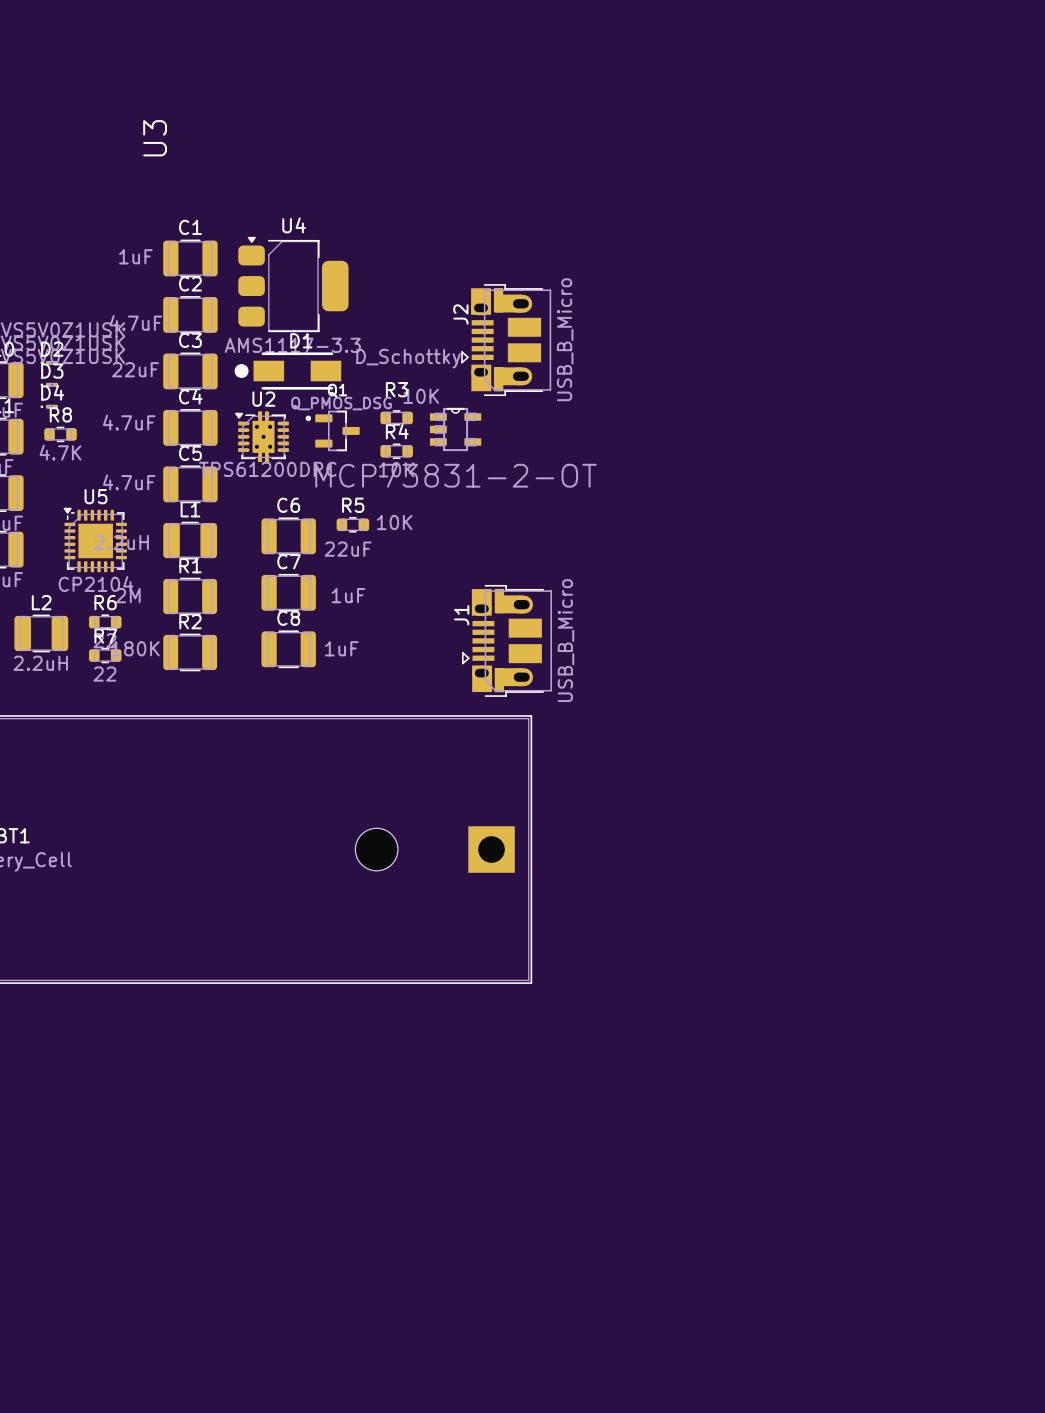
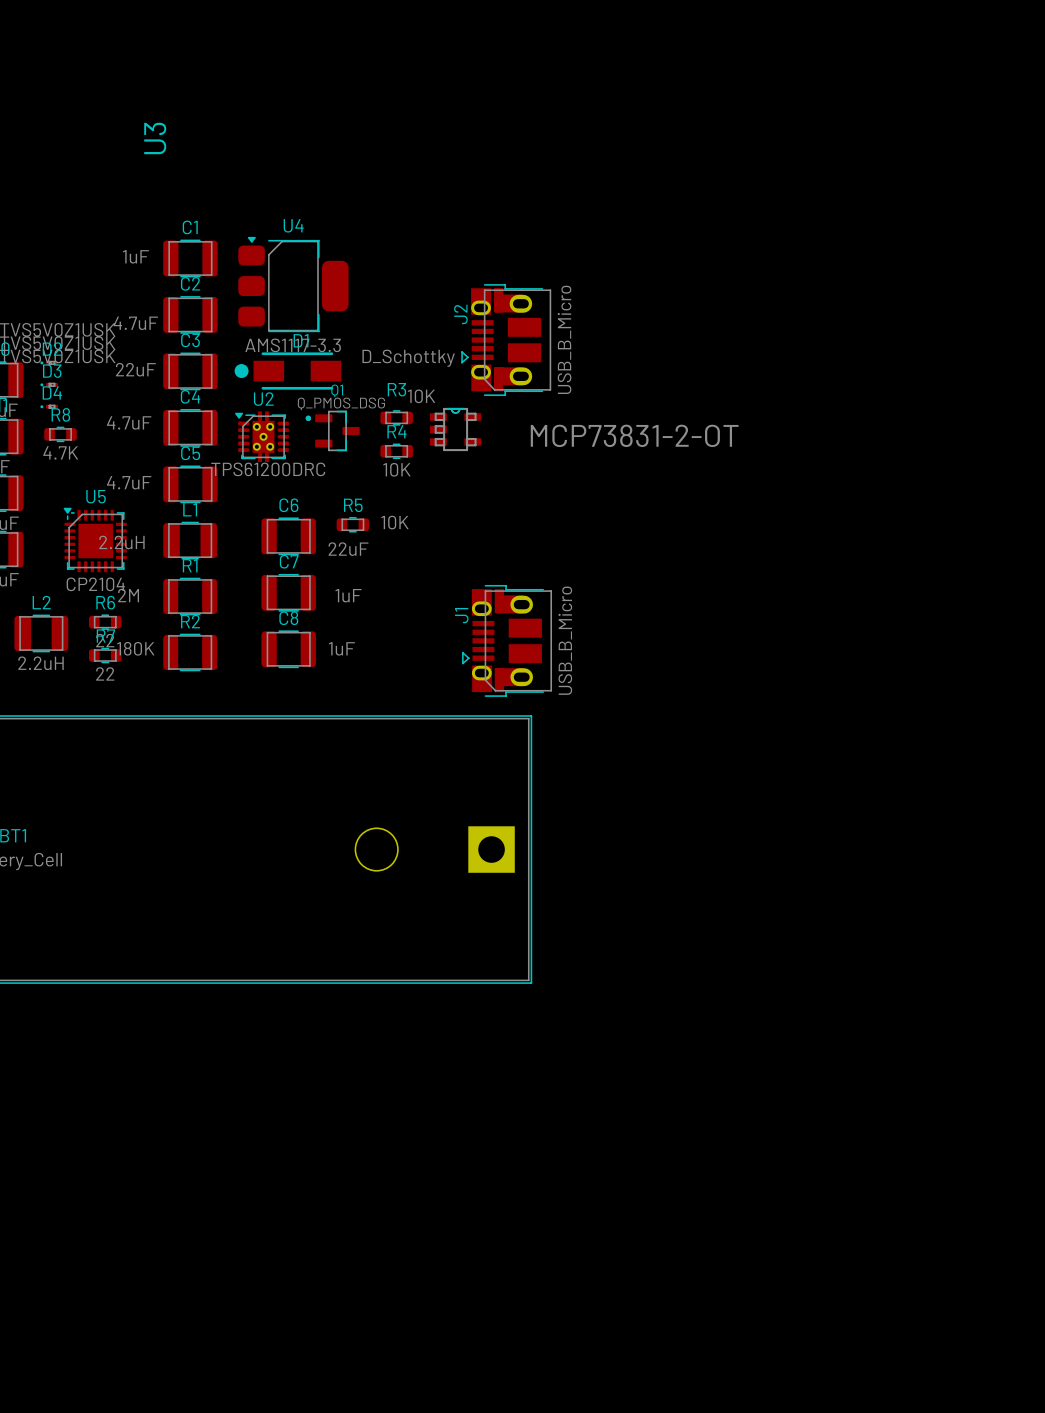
U3 value position: MCP73831-2-OT (456, 475) -> MCP73831-2-OT (634, 435)

